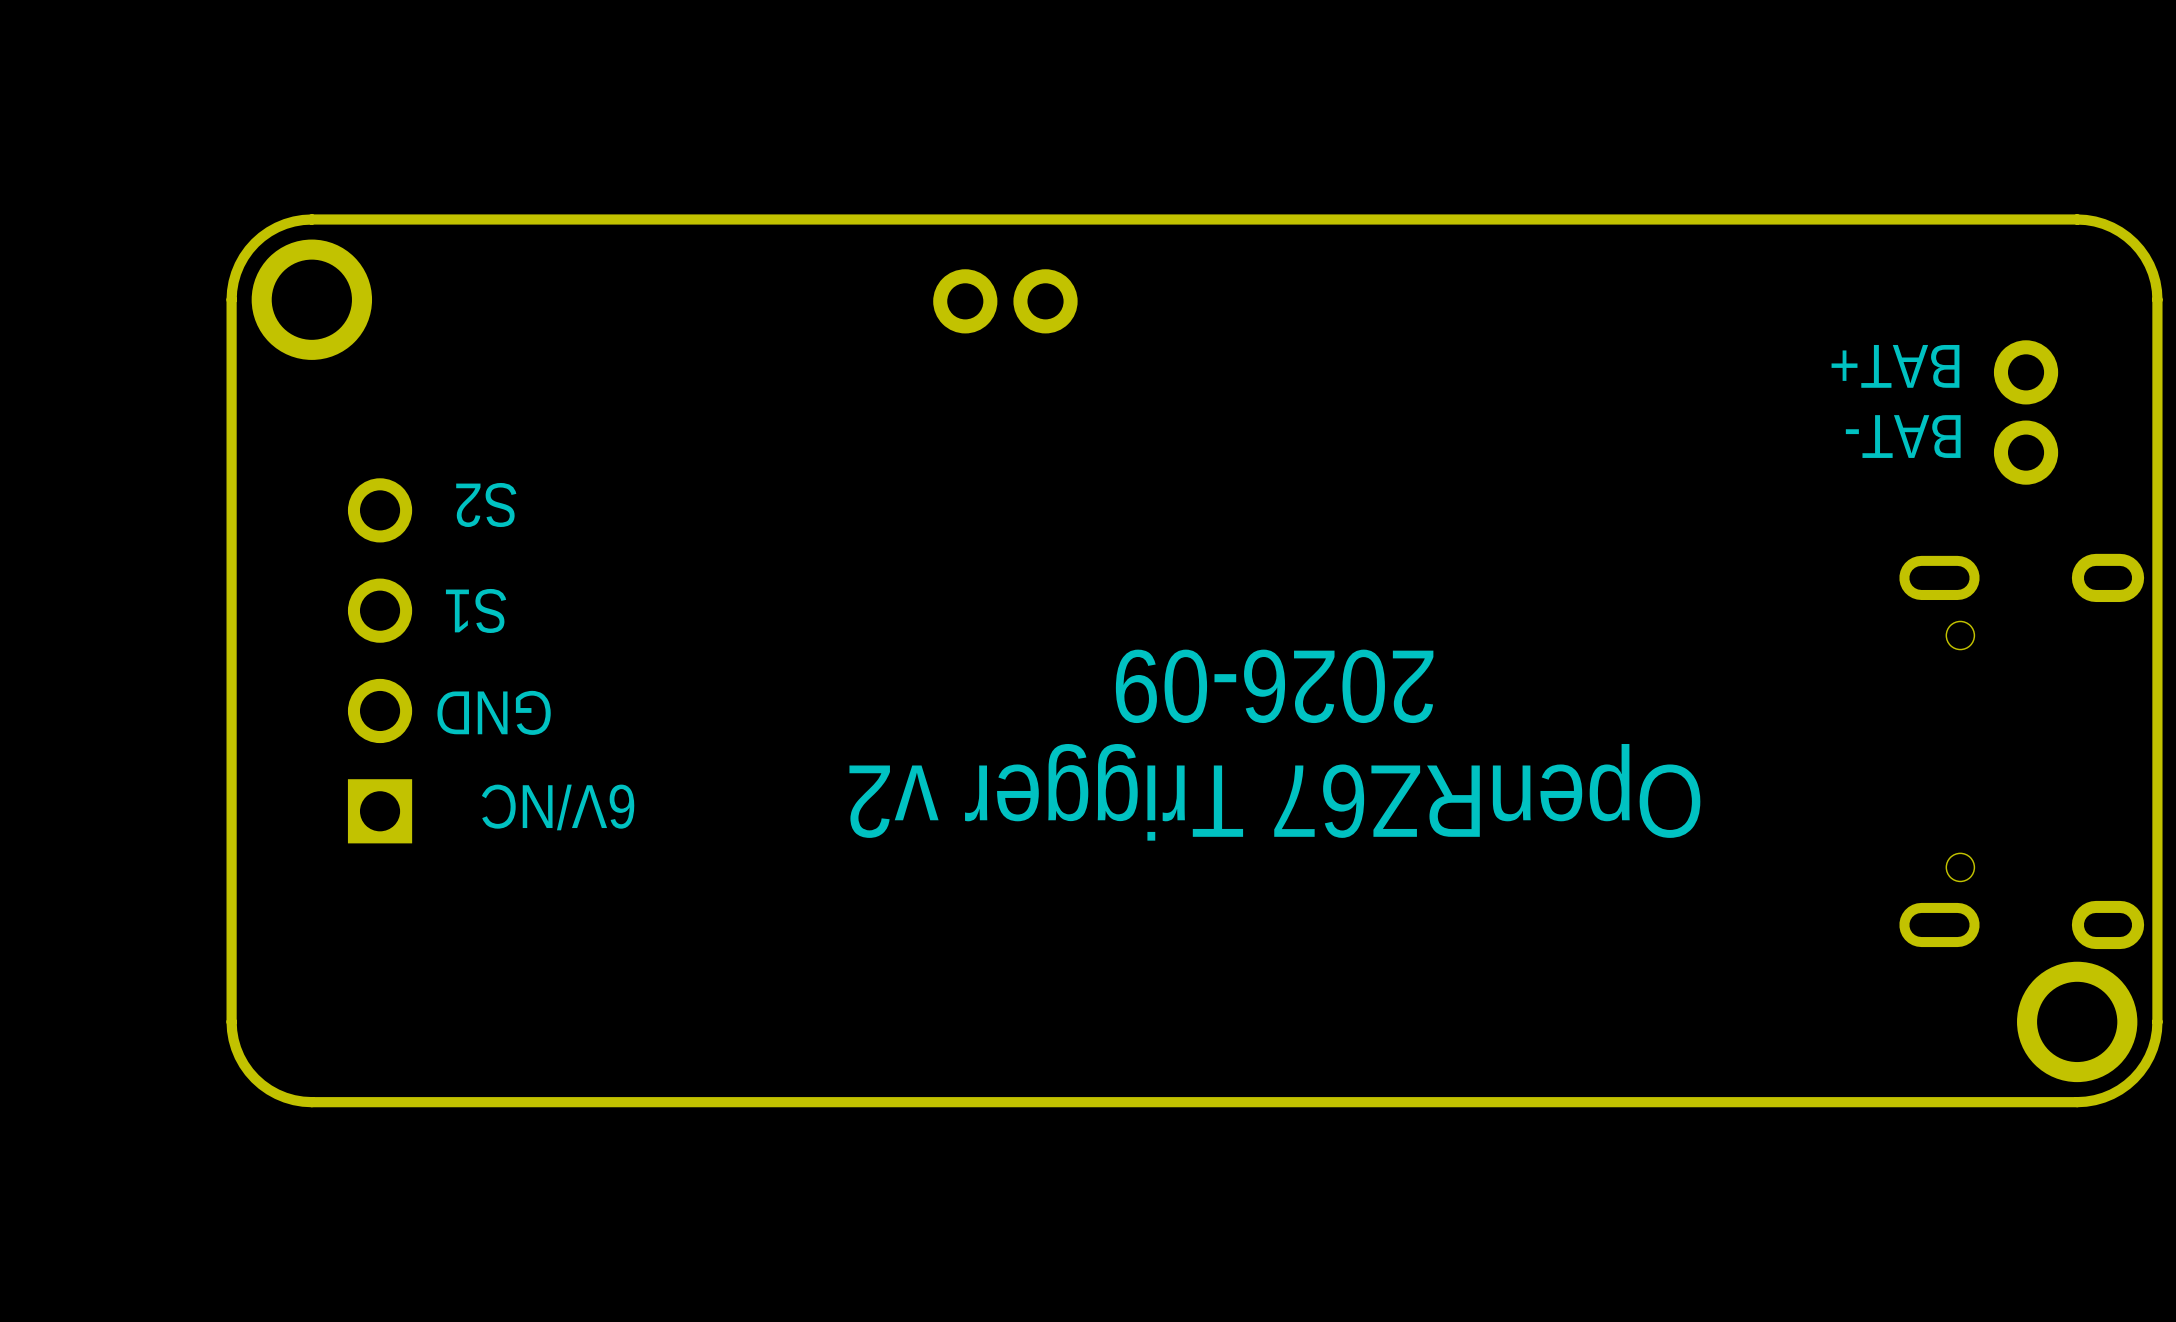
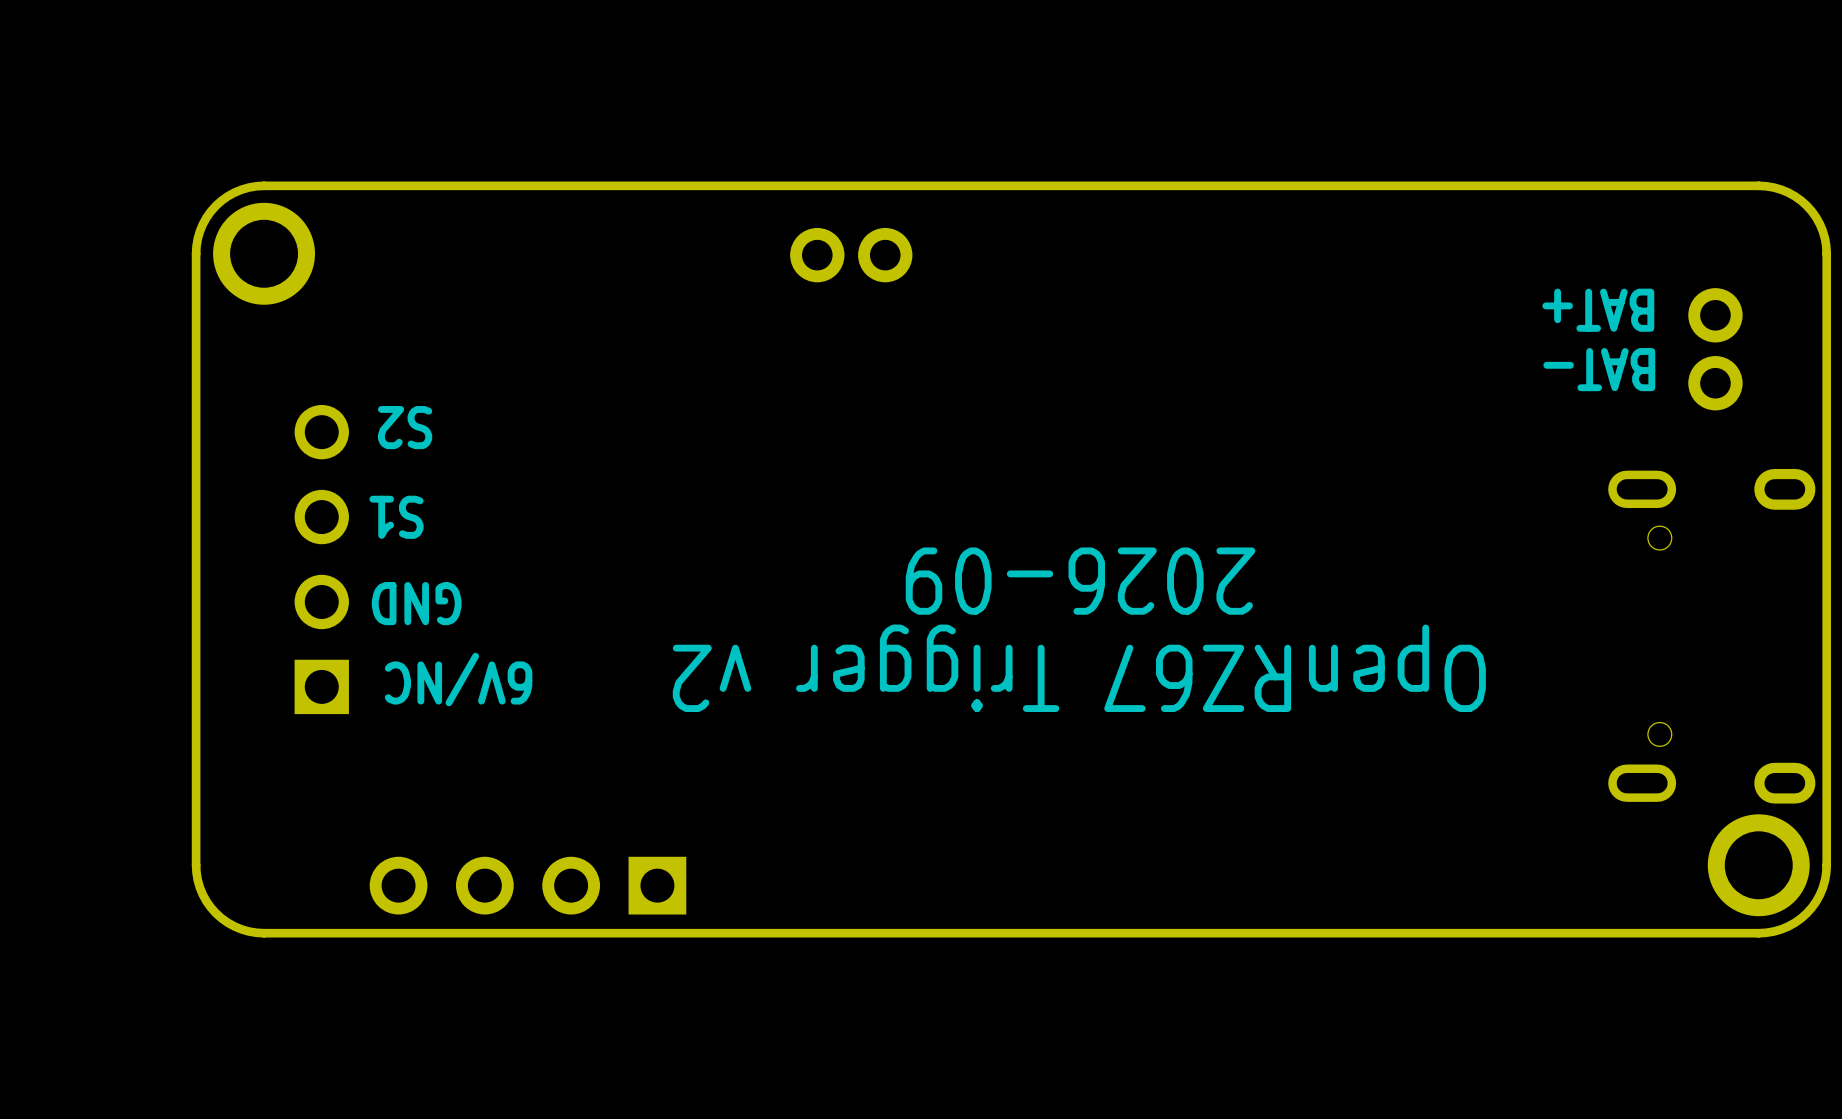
part: none -> (527, 885)

